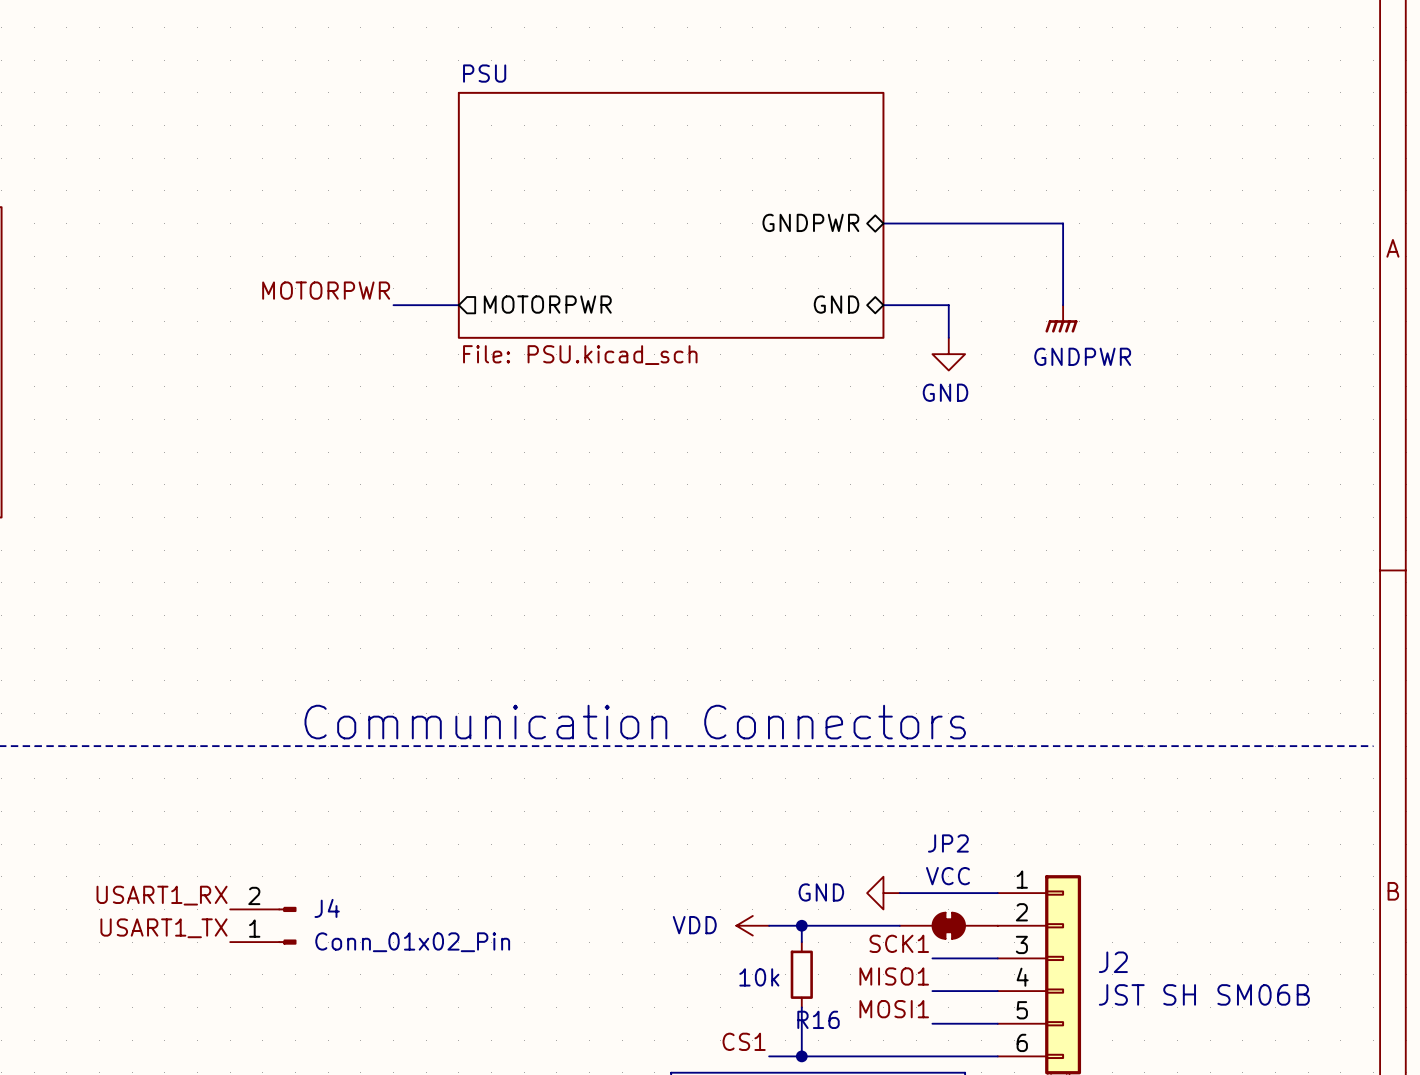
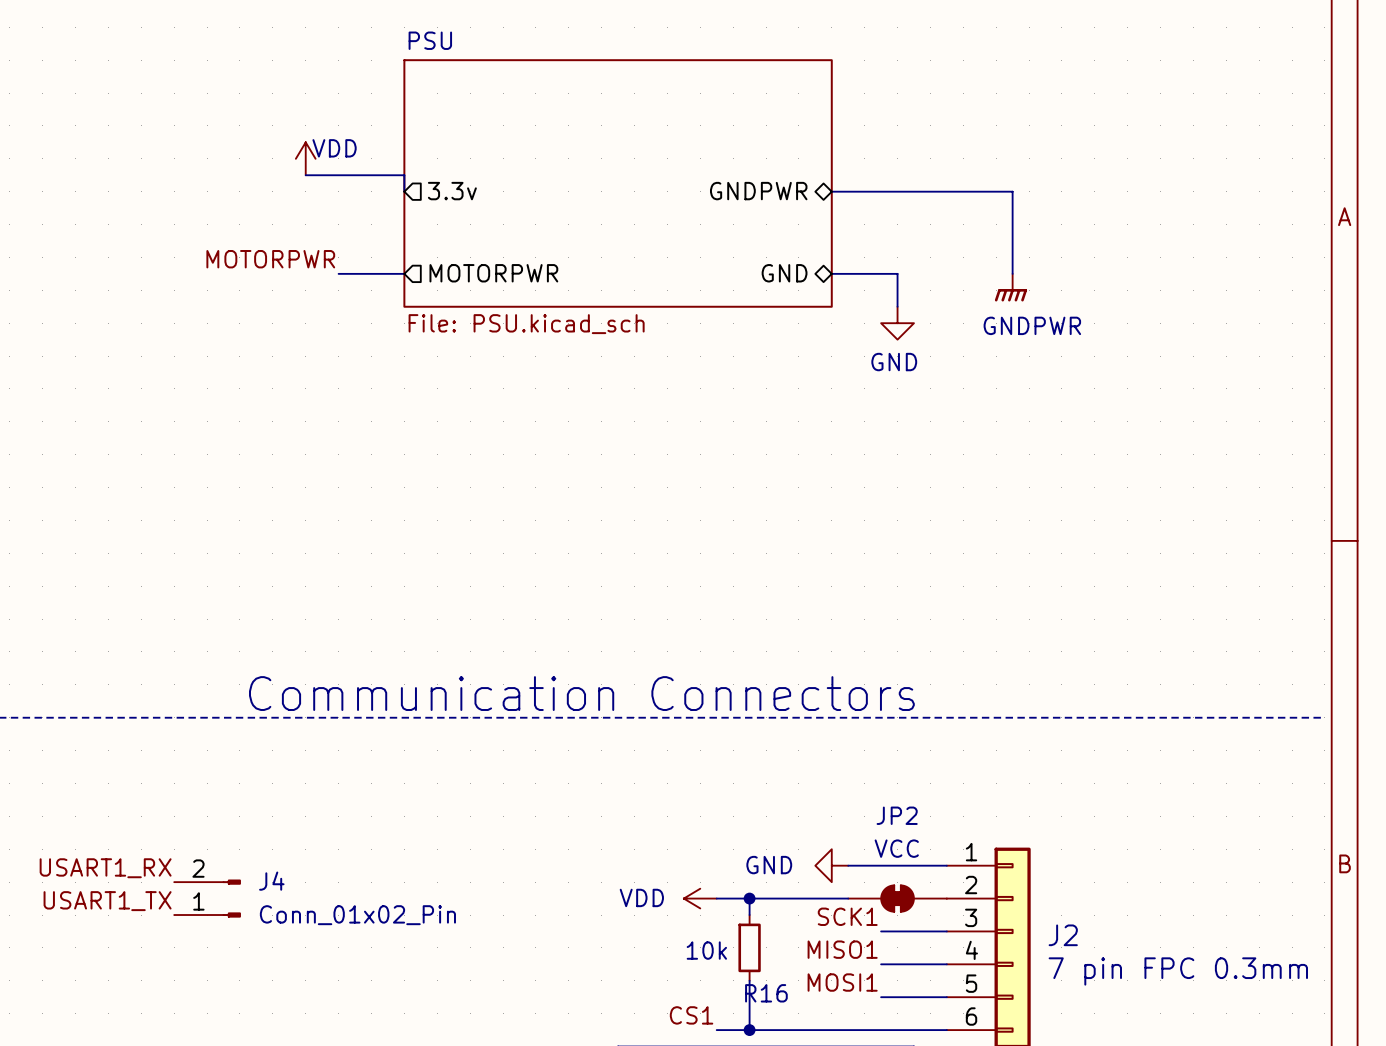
power symbol: none -> VDD (305, 158)
wire: none -> (305, 175) (404, 175) (404, 191)
sheet pin: none -> 3.3v (452, 191)
J2 value: JST SH SM06B (1204, 994) -> 7 pin FPC 0.3mm (1178, 971)

